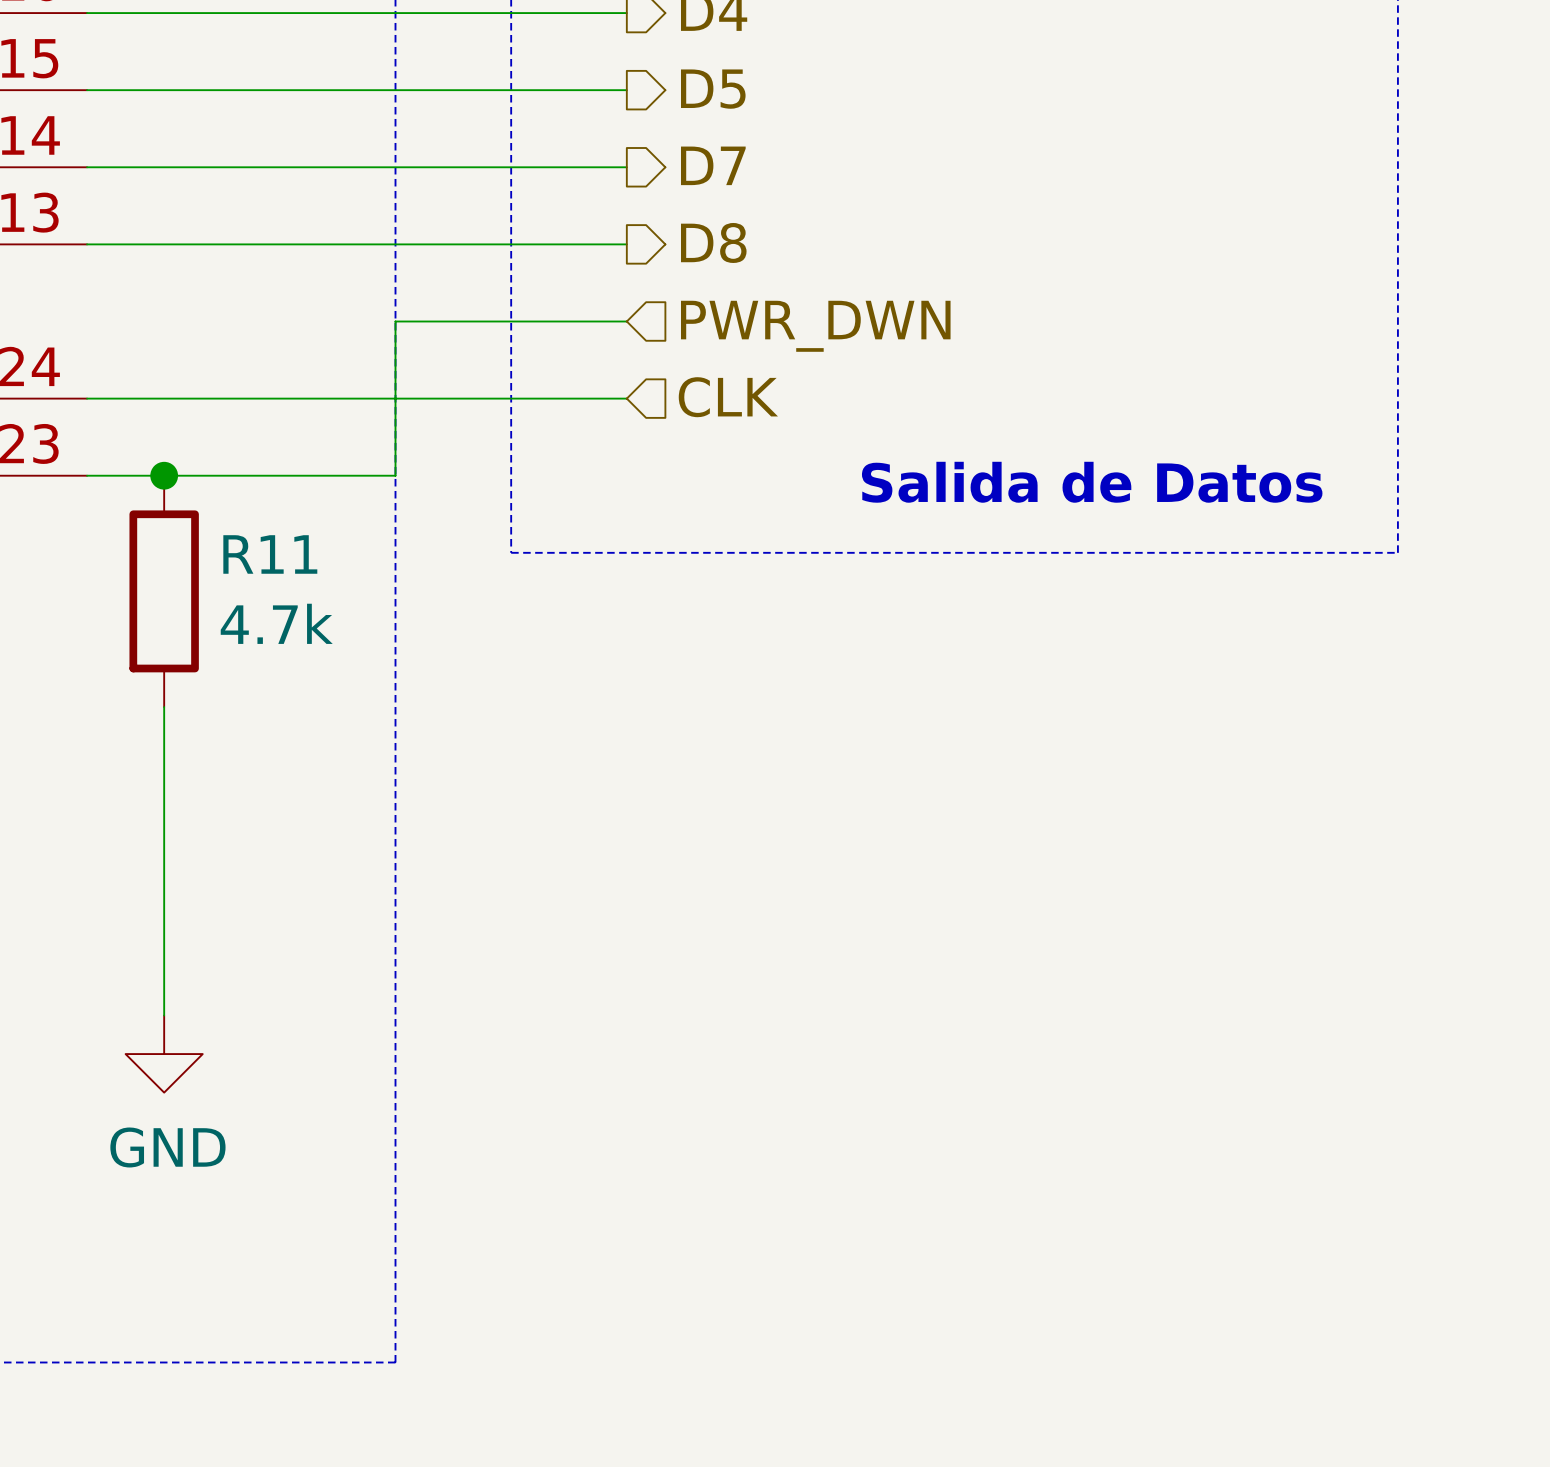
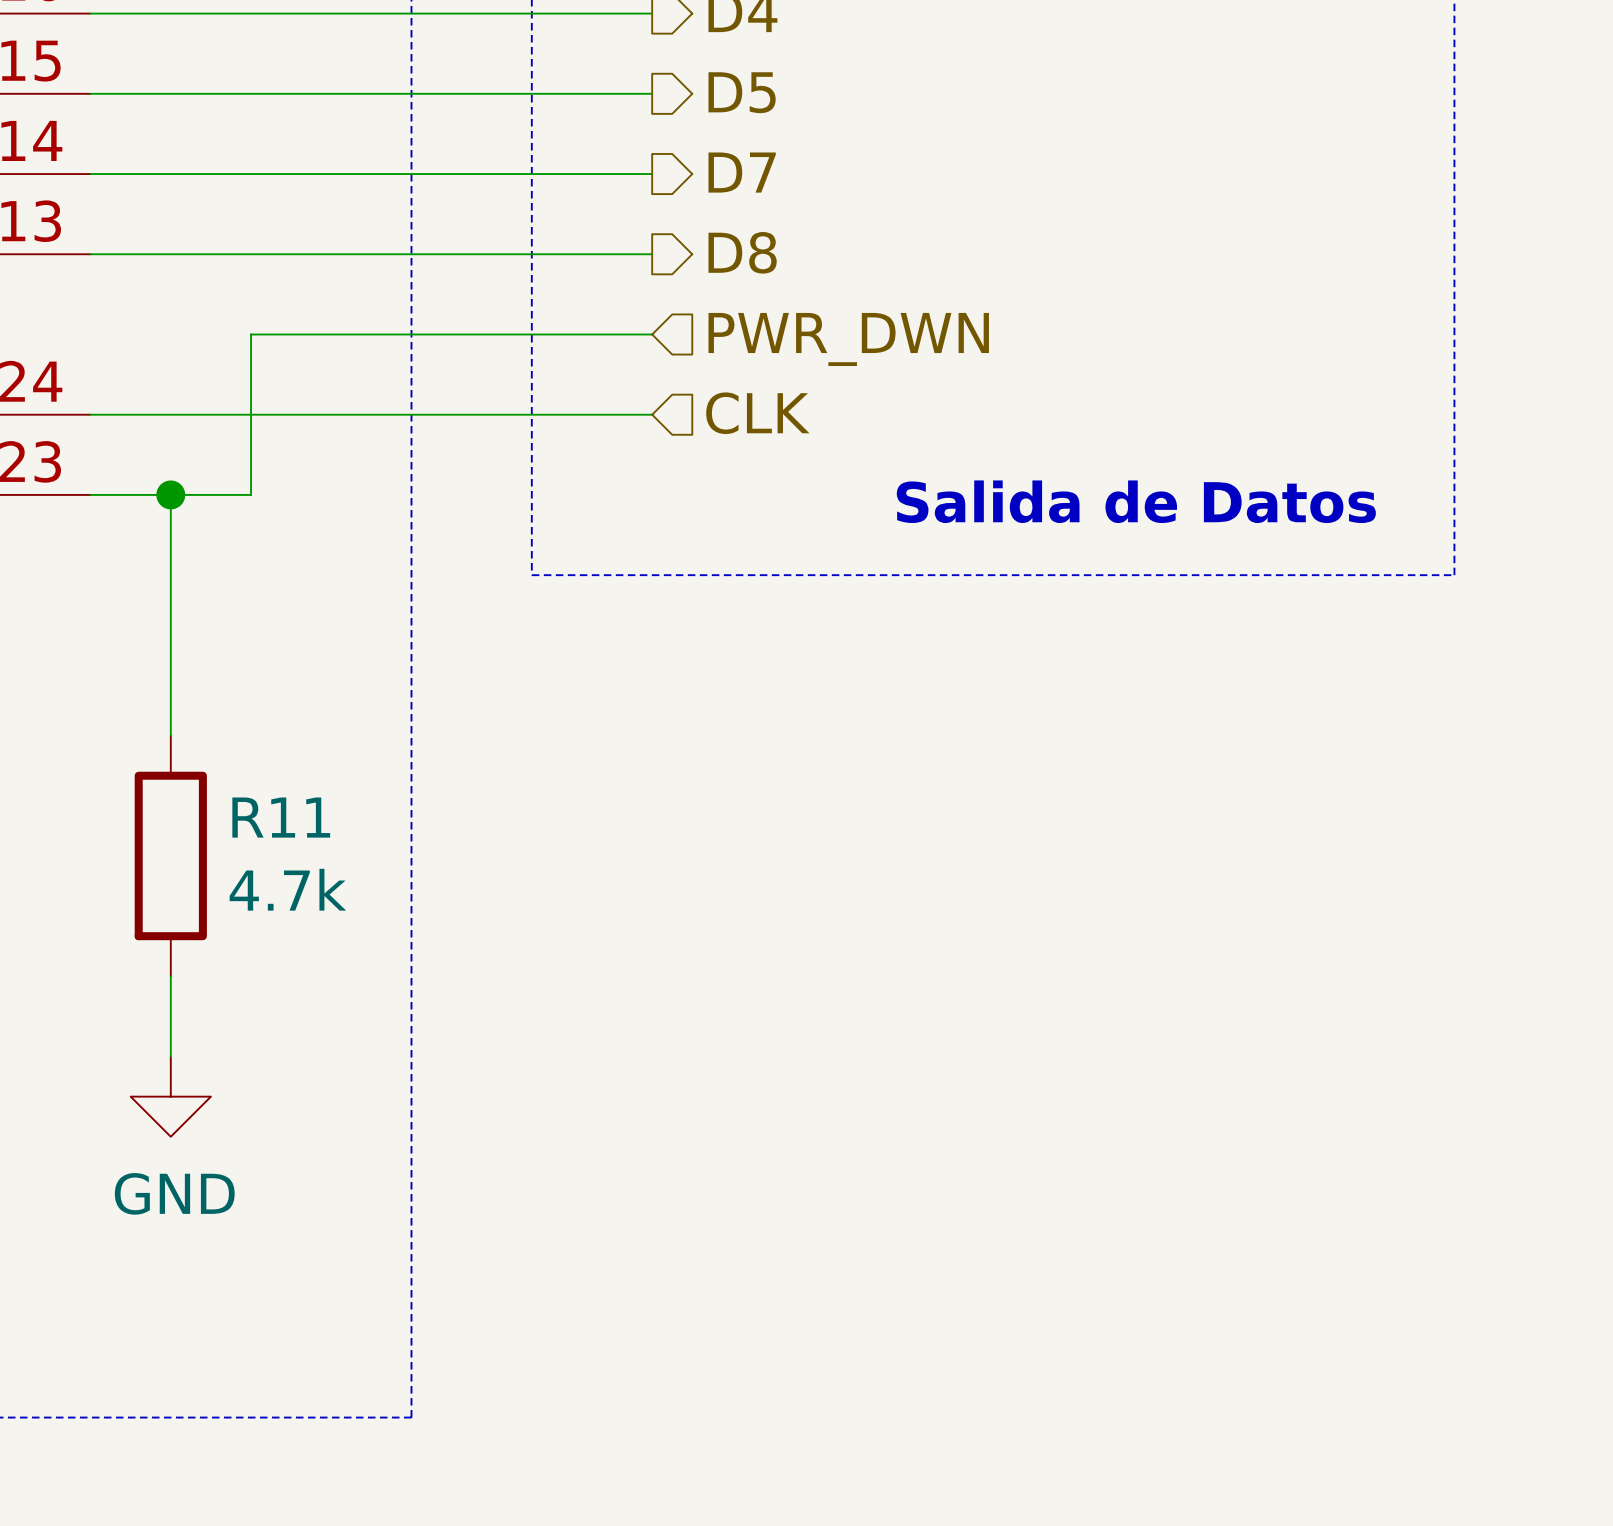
wire: (395, 321) (395, 475) (241, 475) -> (411, 334) (251, 334) (251, 494)
R11 position: (164, 591) -> (170, 855)
wire: (164, 707) (164, 938) -> (170, 735) (170, 494)

